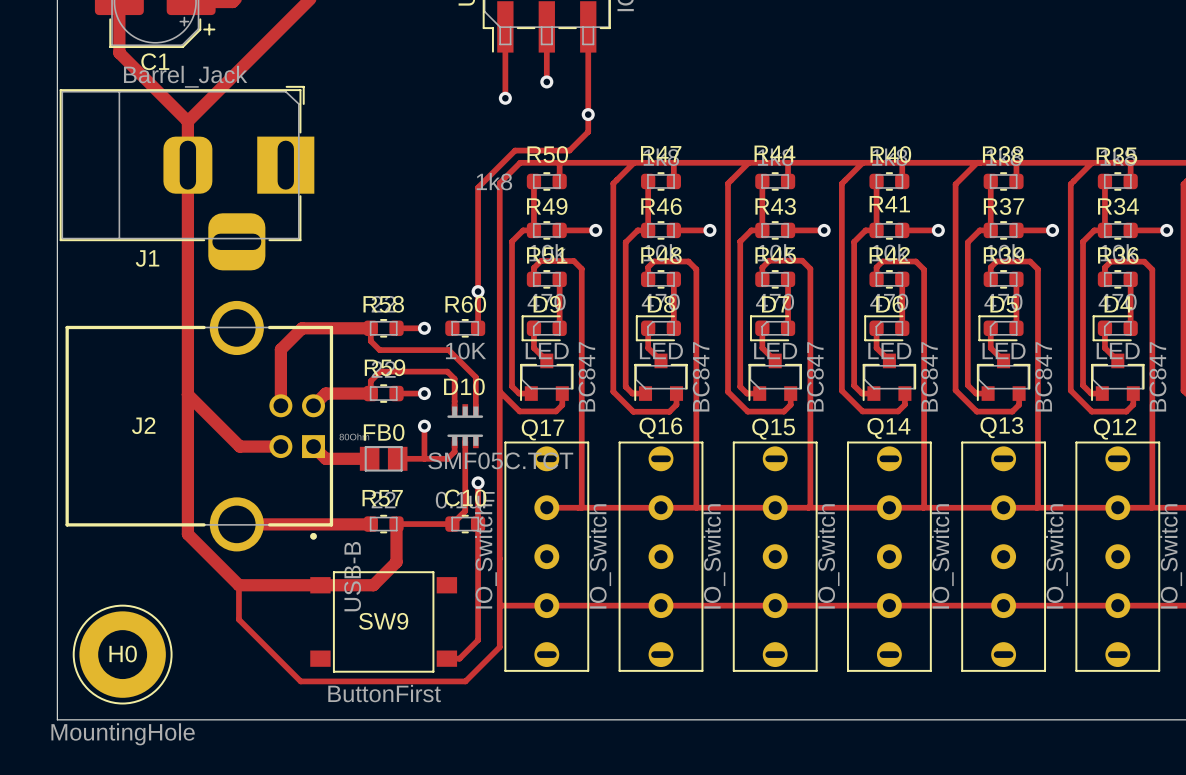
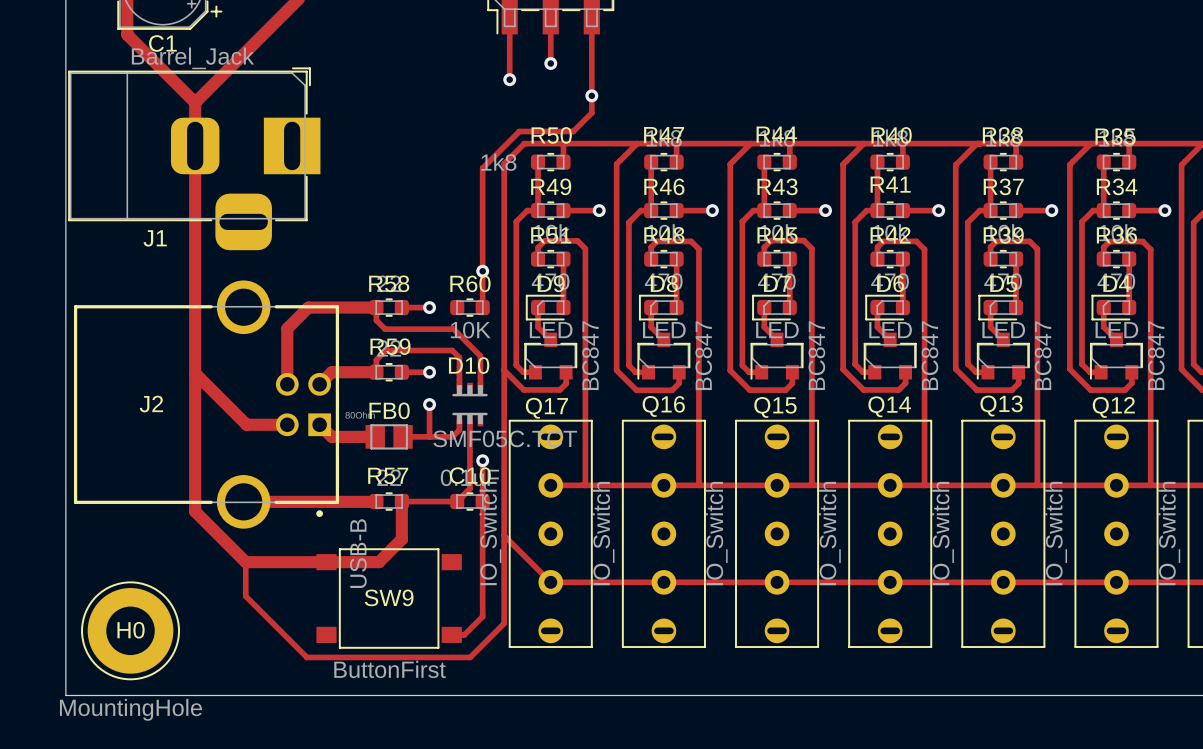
track: (499, 605) (546, 605) -> (504, 535) (550, 582)

